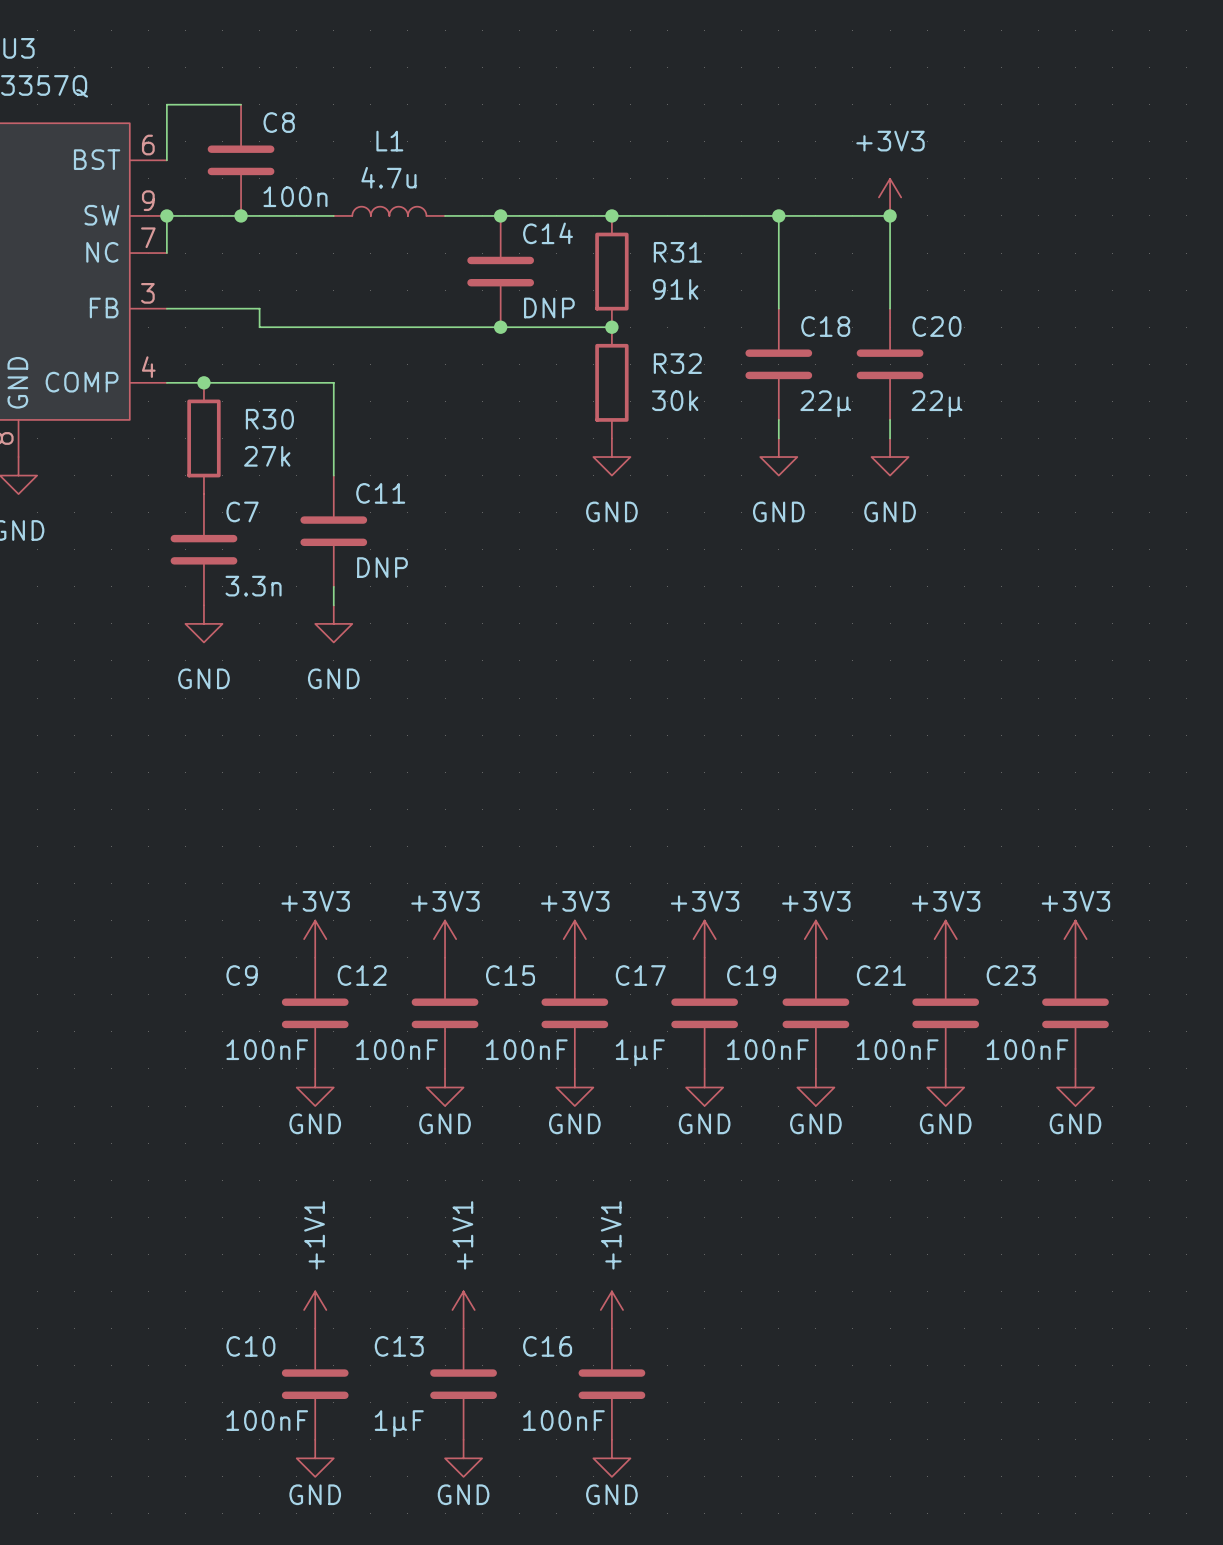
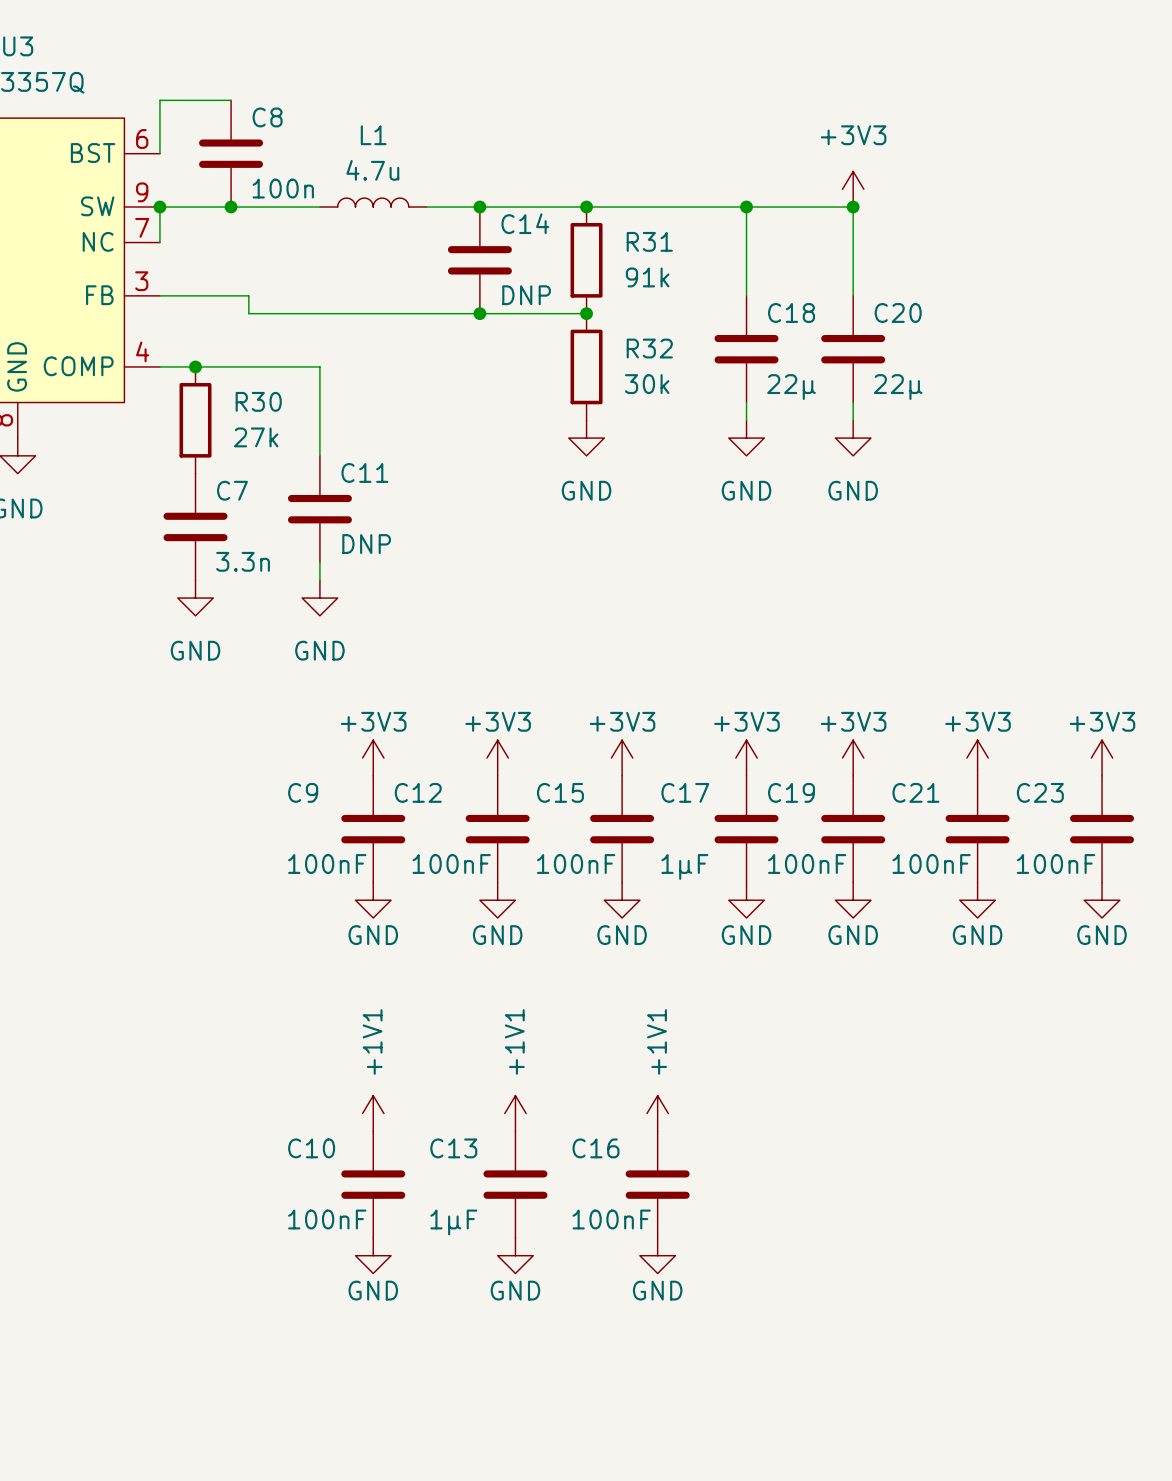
power symbol: none -> +3V3 (373, 758)
power symbol: none -> +3V3 (497, 758)
power symbol: none -> +3V3 (622, 758)
power symbol: none -> +3V3 (746, 758)
power symbol: none -> +3V3 (853, 758)
power symbol: none -> +3V3 (977, 758)
power symbol: none -> +3V3 (1102, 758)
power symbol: +3V3 (315, 939) -> none
power symbol: none -> GND (373, 900)
power symbol: +3V3 (445, 939) -> none
power symbol: none -> GND (497, 900)
power symbol: +3V3 (574, 939) -> none
power symbol: none -> GND (622, 900)
power symbol: +3V3 (704, 939) -> none
power symbol: none -> GND (746, 900)
power symbol: +3V3 (815, 939) -> none
power symbol: none -> GND (853, 900)
power symbol: +3V3 (945, 939) -> none
power symbol: none -> GND (977, 900)
power symbol: +3V3 (1075, 939) -> none
power symbol: none -> GND (1102, 900)
C9 position: (315, 1013) -> (373, 829)
C12 position: (445, 1013) -> (497, 829)
C15 position: (574, 1013) -> (622, 829)
C17 position: (704, 1013) -> (746, 829)
C19 position: (815, 1013) -> (853, 829)
C21 position: (945, 1013) -> (977, 829)
C23 position: (1075, 1013) -> (1102, 829)
power symbol: GND (315, 1087) -> none
power symbol: GND (445, 1087) -> none
power symbol: GND (574, 1087) -> none
power symbol: GND (704, 1087) -> none
power symbol: GND (815, 1087) -> none
power symbol: GND (945, 1087) -> none
power symbol: GND (1075, 1087) -> none
power symbol: none -> +1V1 (373, 1113)
power symbol: none -> +1V1 (515, 1113)
power symbol: none -> +1V1 (657, 1113)
power symbol: +1V1 (315, 1310) -> none
power symbol: none -> GND (373, 1255)
power symbol: +1V1 (463, 1310) -> none
power symbol: none -> GND (515, 1255)
power symbol: +1V1 (611, 1310) -> none
power symbol: none -> GND (657, 1255)
C10 position: (315, 1384) -> (373, 1184)
C13 position: (463, 1384) -> (515, 1184)
C16 position: (611, 1384) -> (657, 1184)
power symbol: GND (315, 1458) -> none
power symbol: GND (463, 1458) -> none
power symbol: GND (611, 1458) -> none

